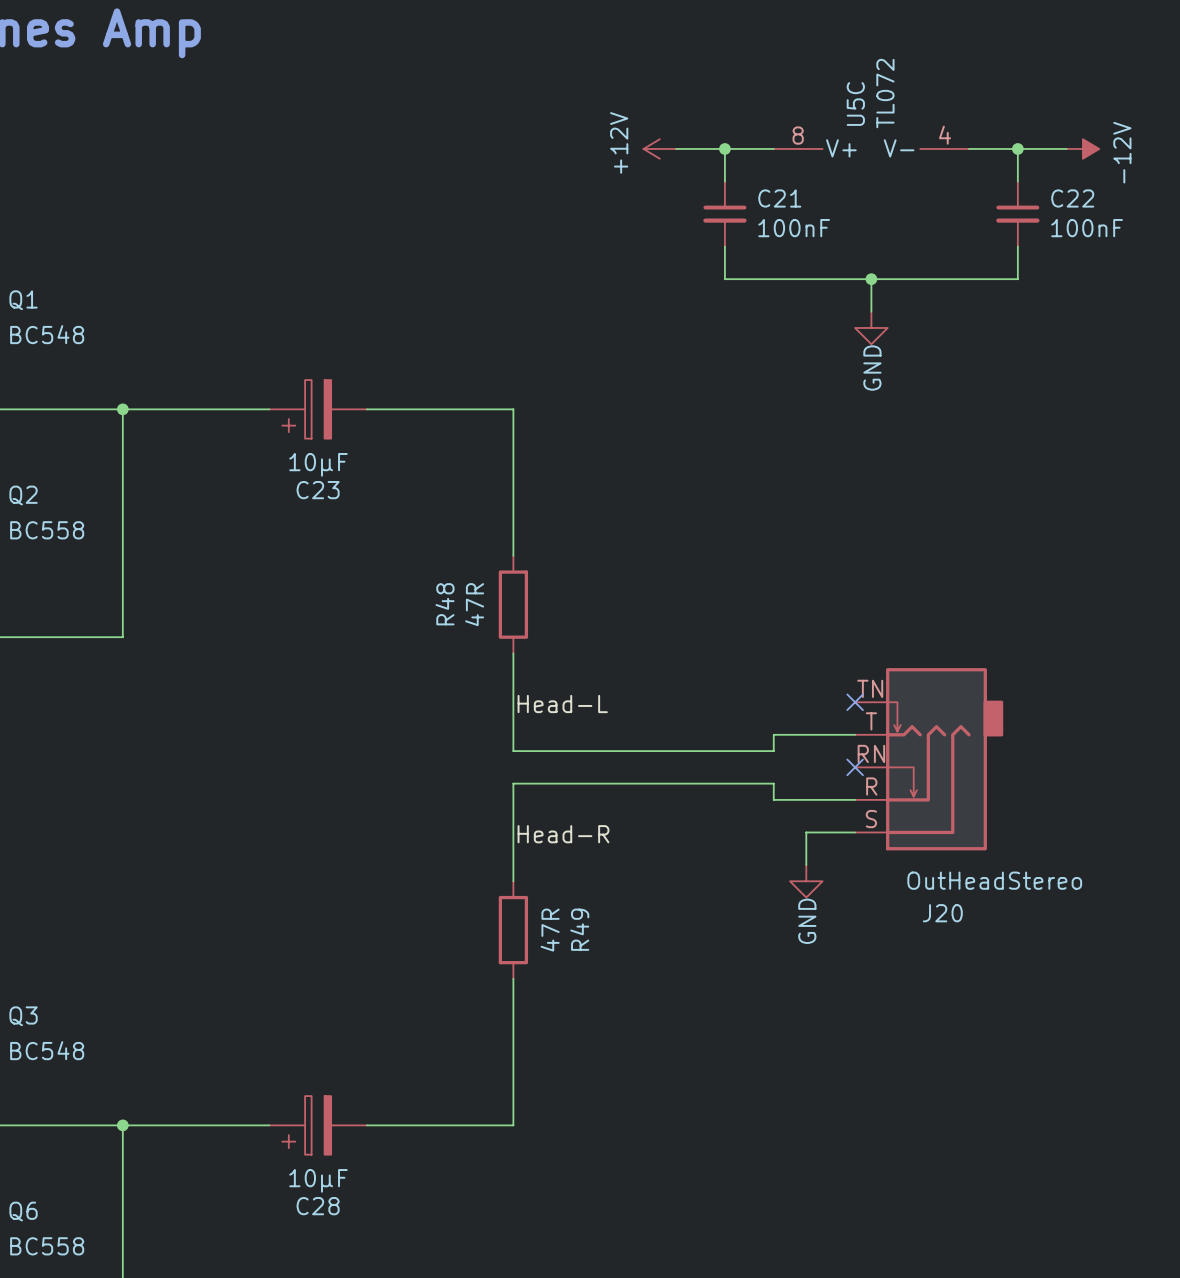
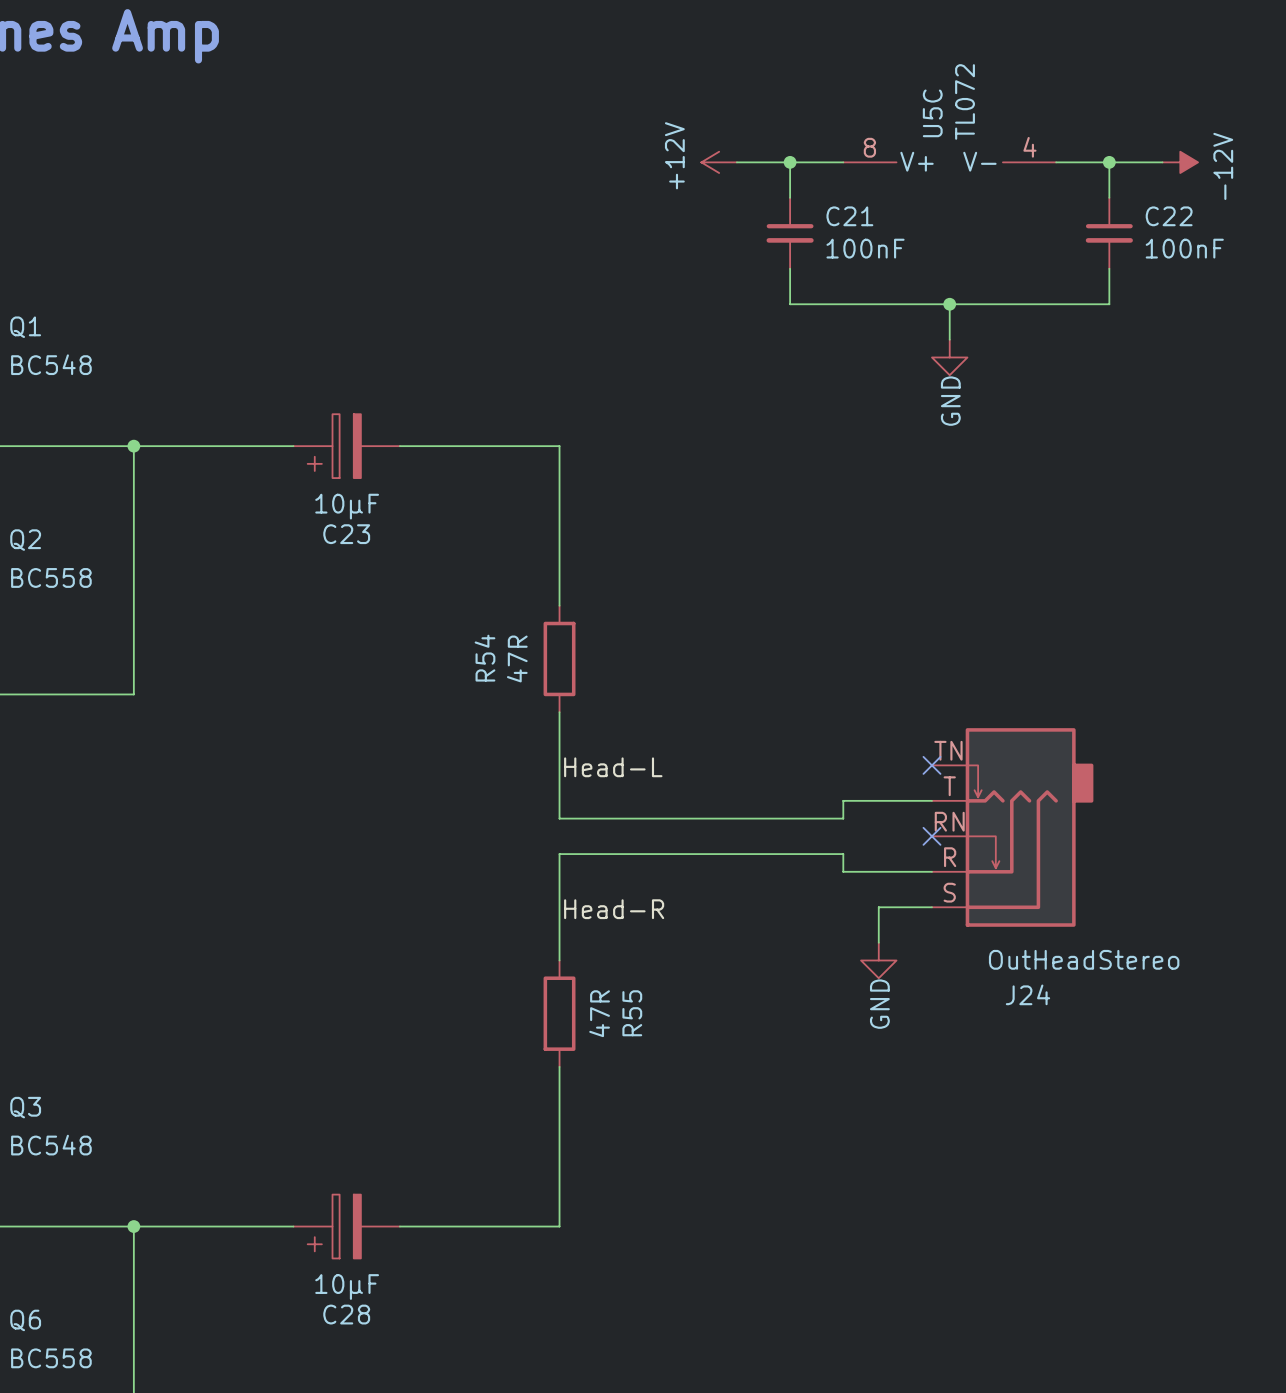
R48 name: R48 (445, 604) -> R54 (485, 658)
J20 name: J20 (942, 913) -> J24 (1027, 994)
R49 name: R49 (579, 929) -> R55 (632, 1013)

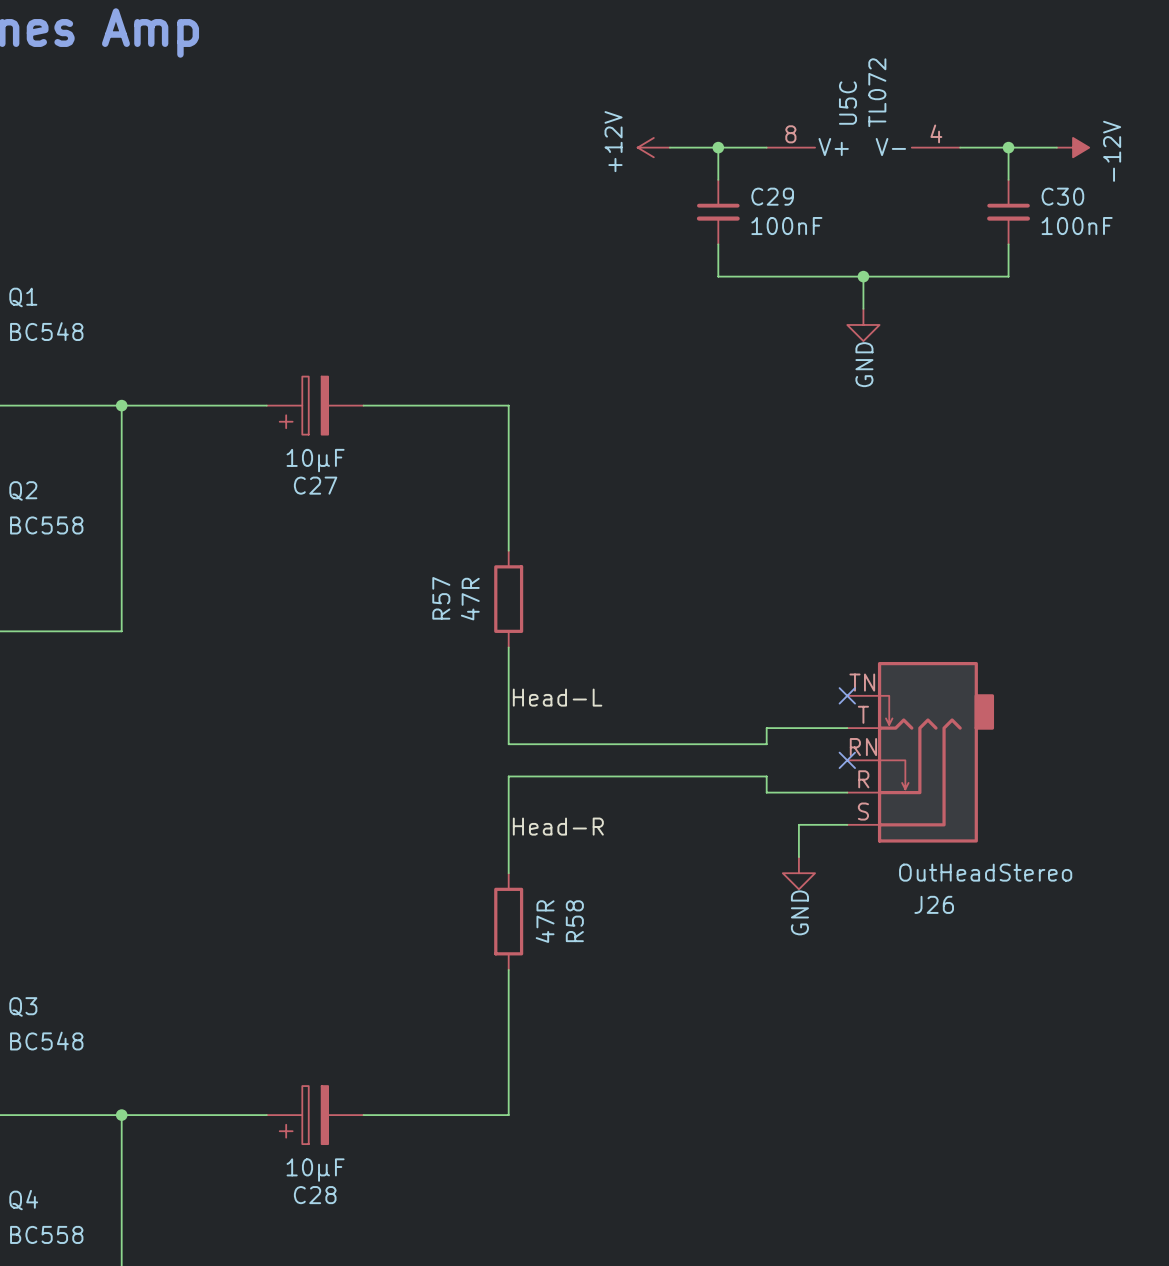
C21 name: C21 (849, 216) -> C29 (772, 196)
C22 name: C22 (1169, 216) -> C30 (1062, 196)
C23 name: C23 (346, 534) -> C27 (315, 485)
R54 name: R54 (485, 658) -> R57 (441, 598)
J24 name: J24 (1027, 994) -> J26 (934, 904)
R55 name: R55 (632, 1013) -> R58 (574, 921)
Q6 name: Q6 (25, 1320) -> Q4 (23, 1200)

